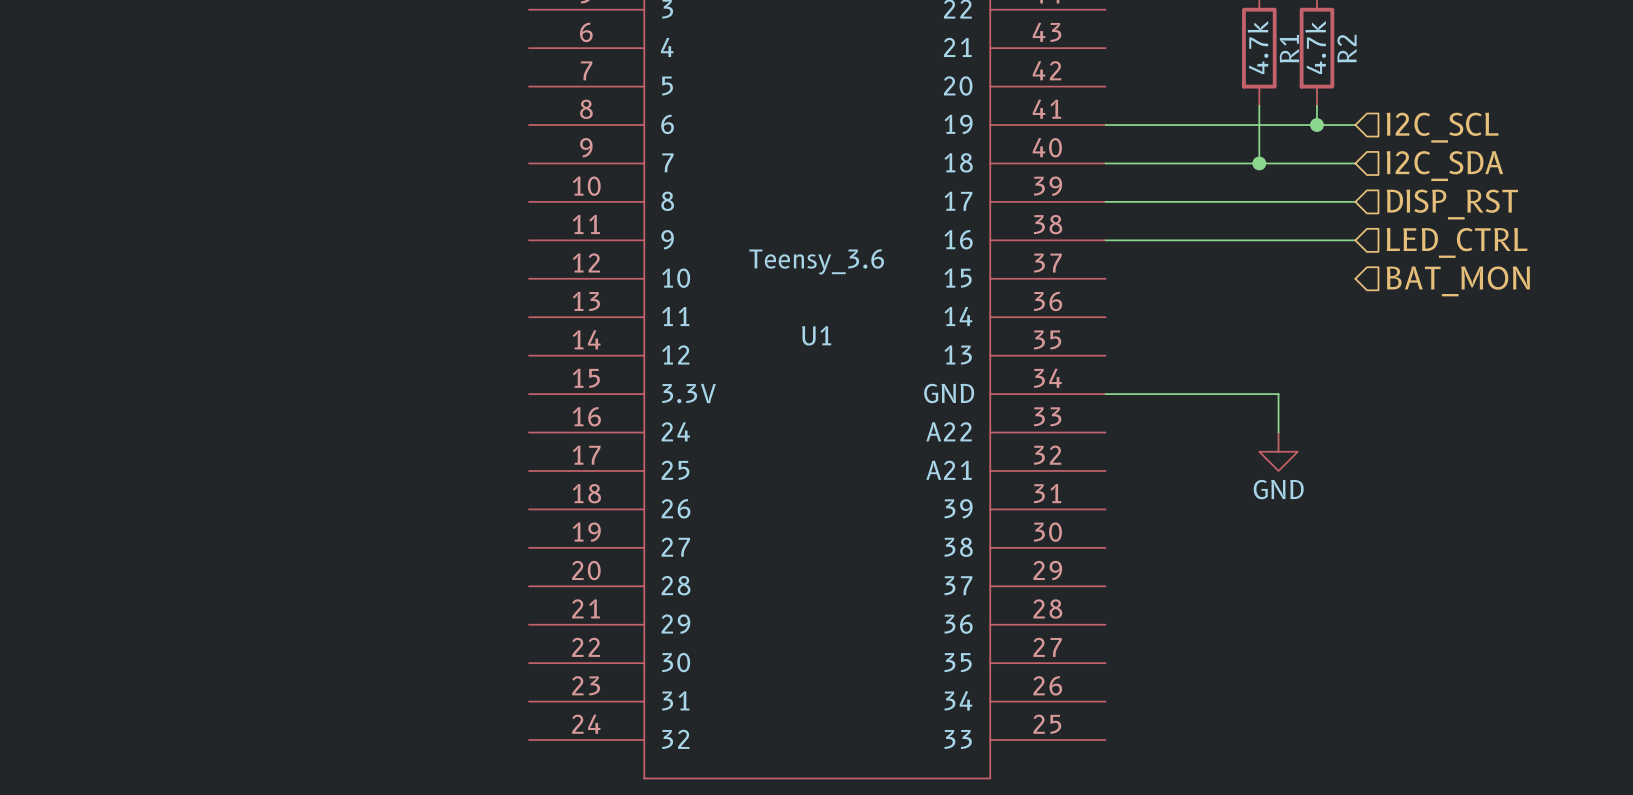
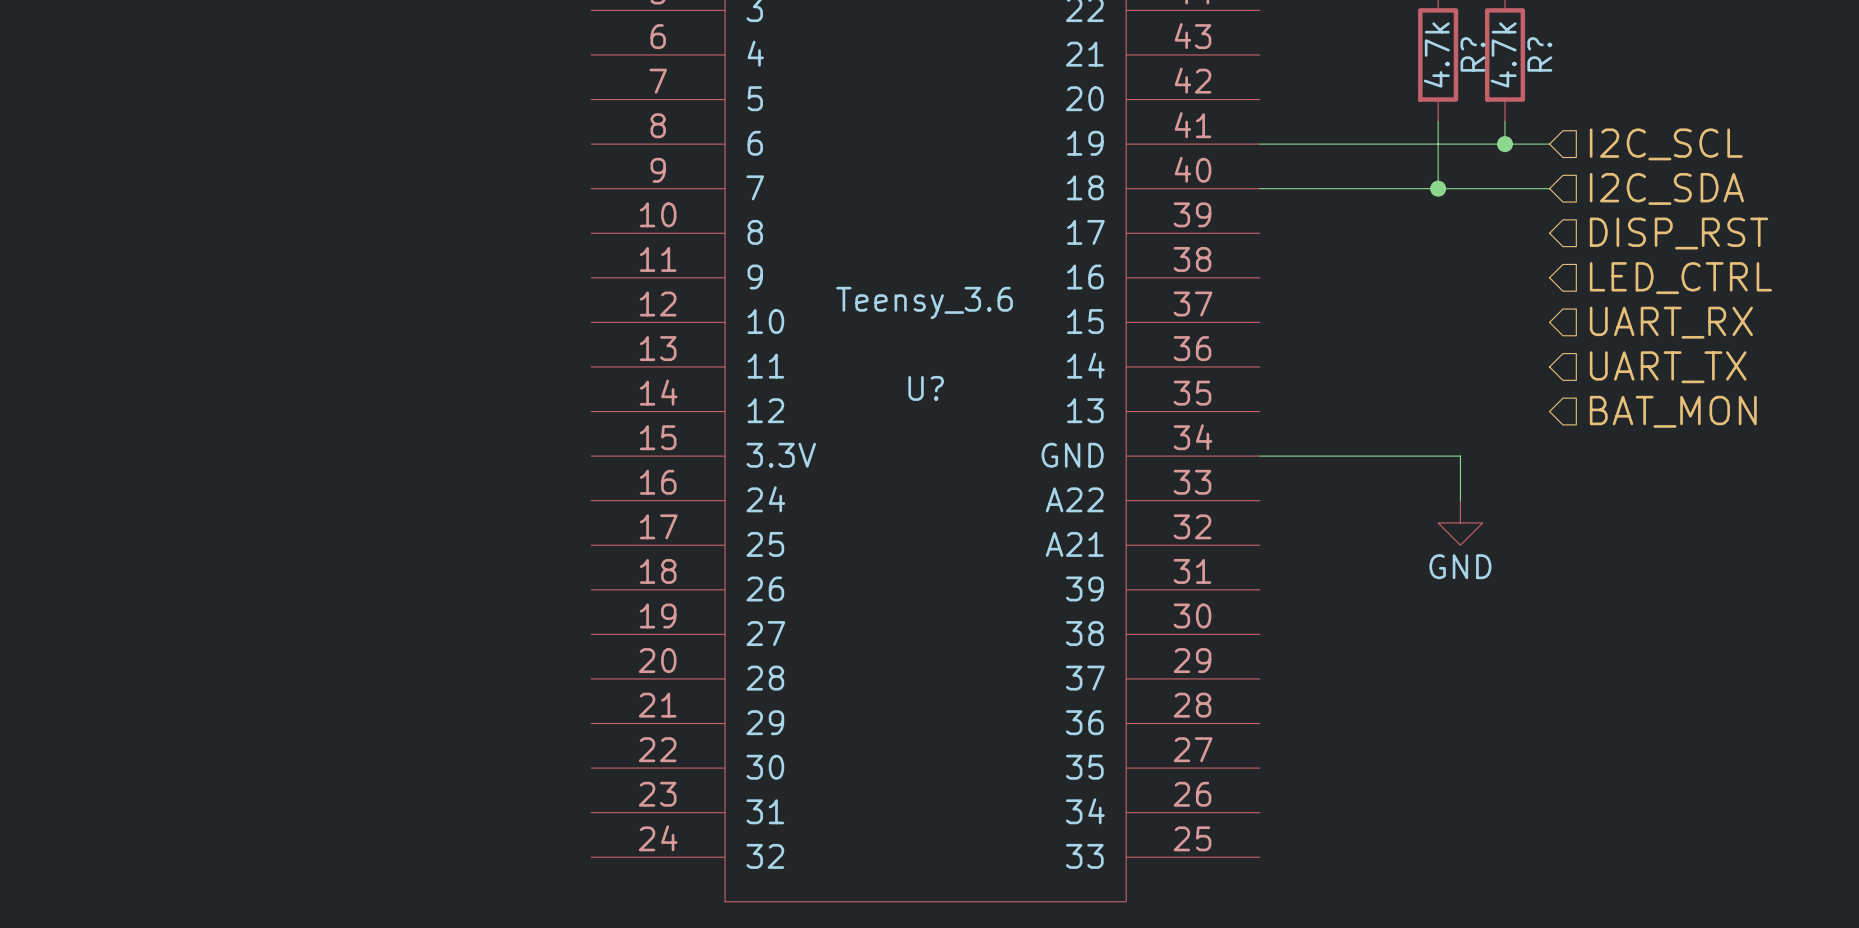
R1 name: R1 (1289, 48) -> R? (1472, 54)
R2 name: R2 (1347, 48) -> R? (1539, 54)
wire: (1105, 201) (1355, 201) -> none
wire: (1105, 240) (1355, 240) -> none
hierarchical label: BAT_MON (1458, 281) -> UART_RX (1671, 322)
hierarchical label: none -> UART_TX (1668, 367)
U1 name: U1 (816, 335) -> U? (926, 388)
hierarchical label: none -> BAT_MON (1673, 411)

